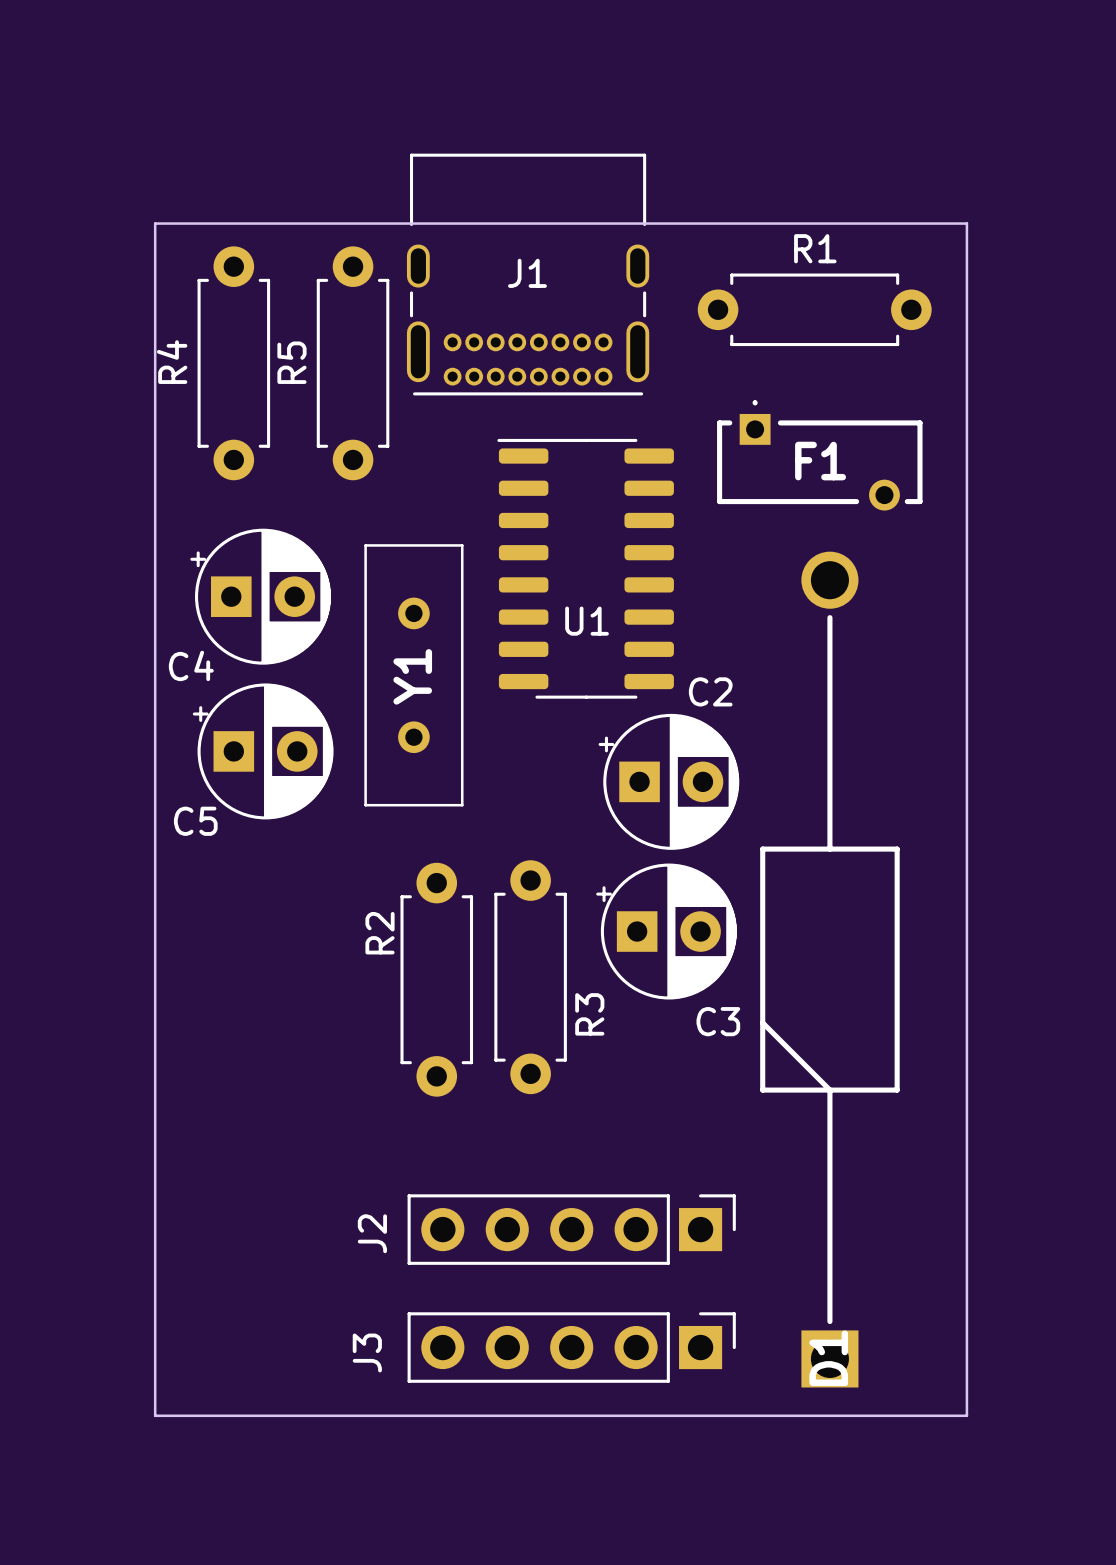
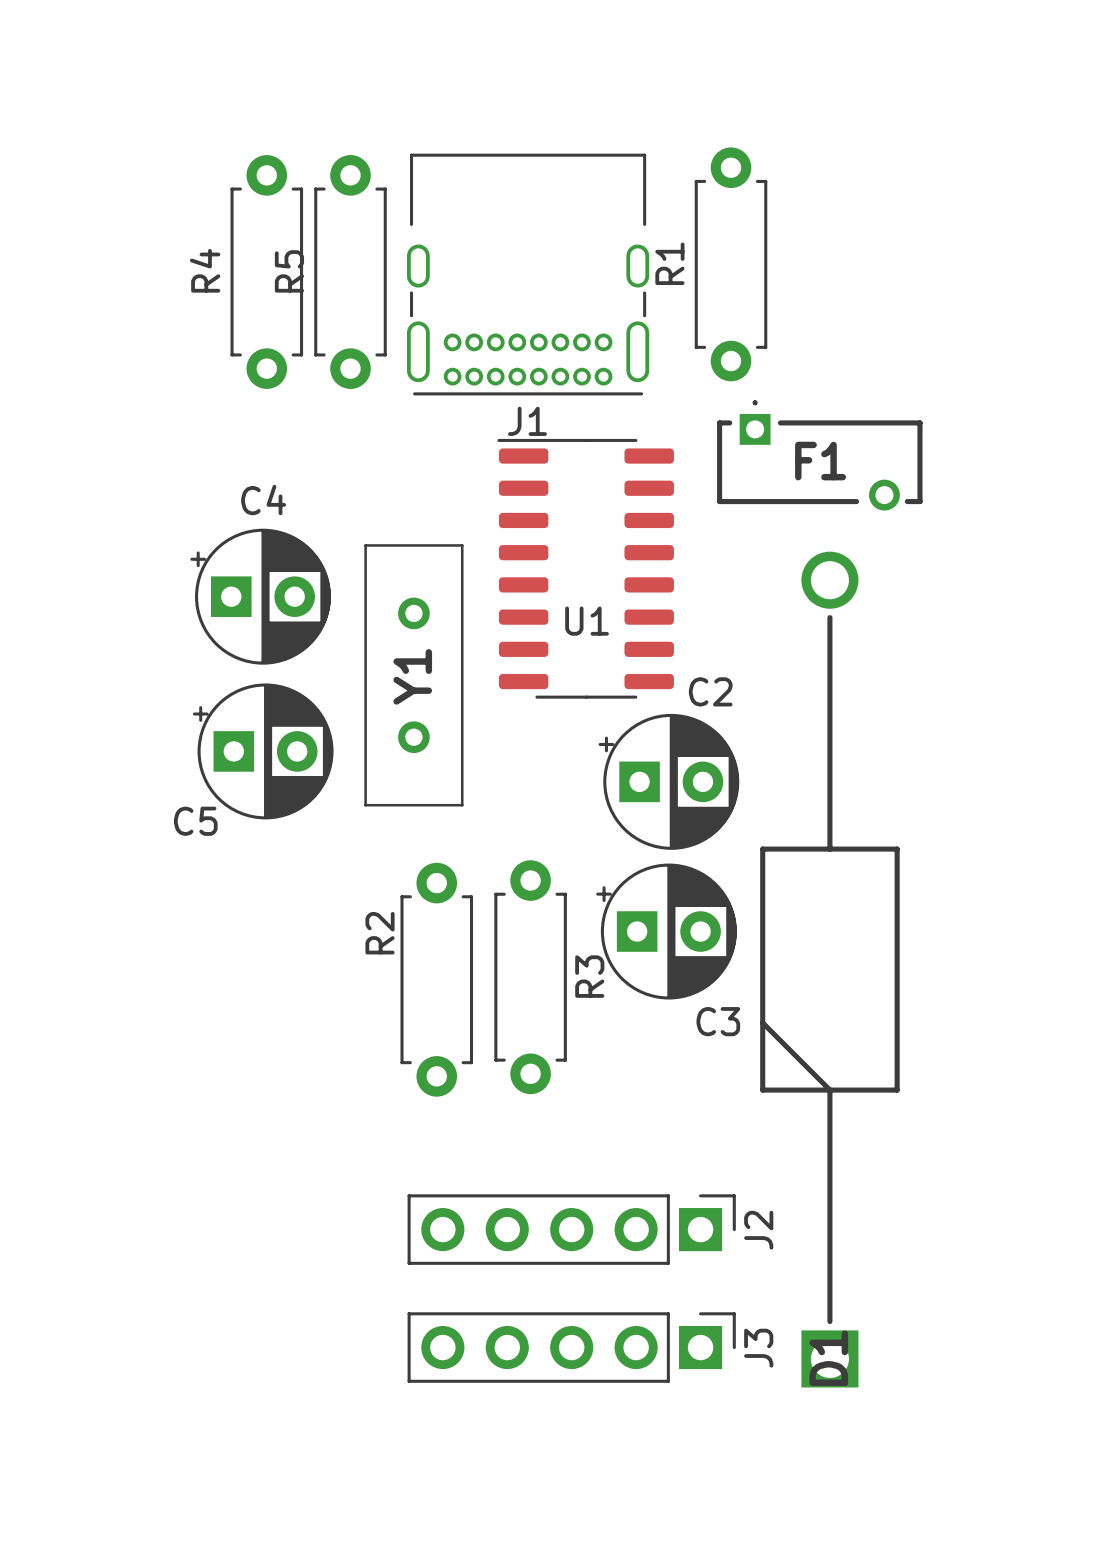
board edge: (155, 223) (966, 223) (966, 1415) (155, 1415) (155, 223) -> none
R1 name position: R1 (815, 248) -> R1 (669, 263)
J1 name position: J1 (527, 273) -> J1 (527, 421)
R1 rotation: 0° (814, 309) -> 90° clockwise (731, 264)
R4 position: (233, 363) -> (266, 272)
R5 position: (353, 363) -> (350, 272)
C4 name position: C4 (191, 665) -> C4 (263, 500)
R3 name position: R3 (589, 1014) -> R3 (589, 976)
J2 name position: J2 (372, 1233) -> J2 (758, 1230)
J3 name position: J3 (367, 1352) -> J3 (758, 1348)

